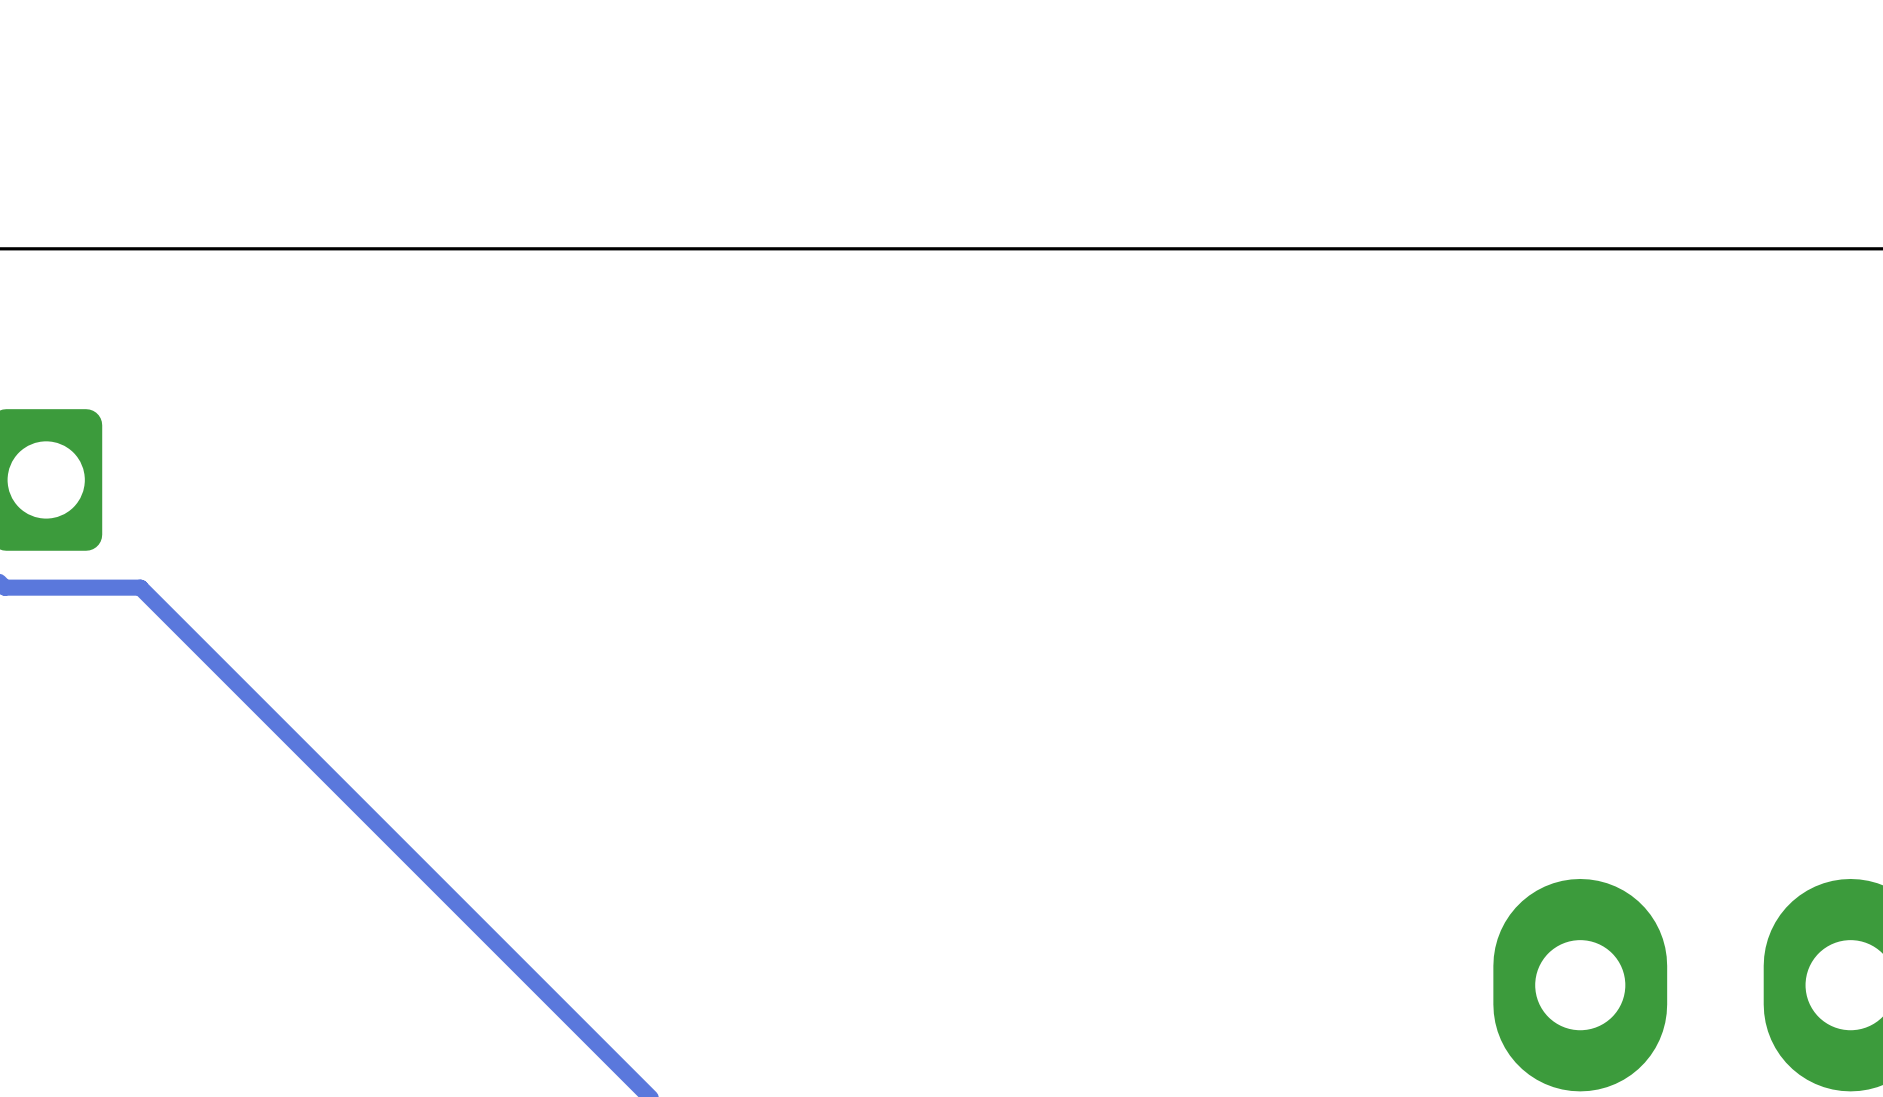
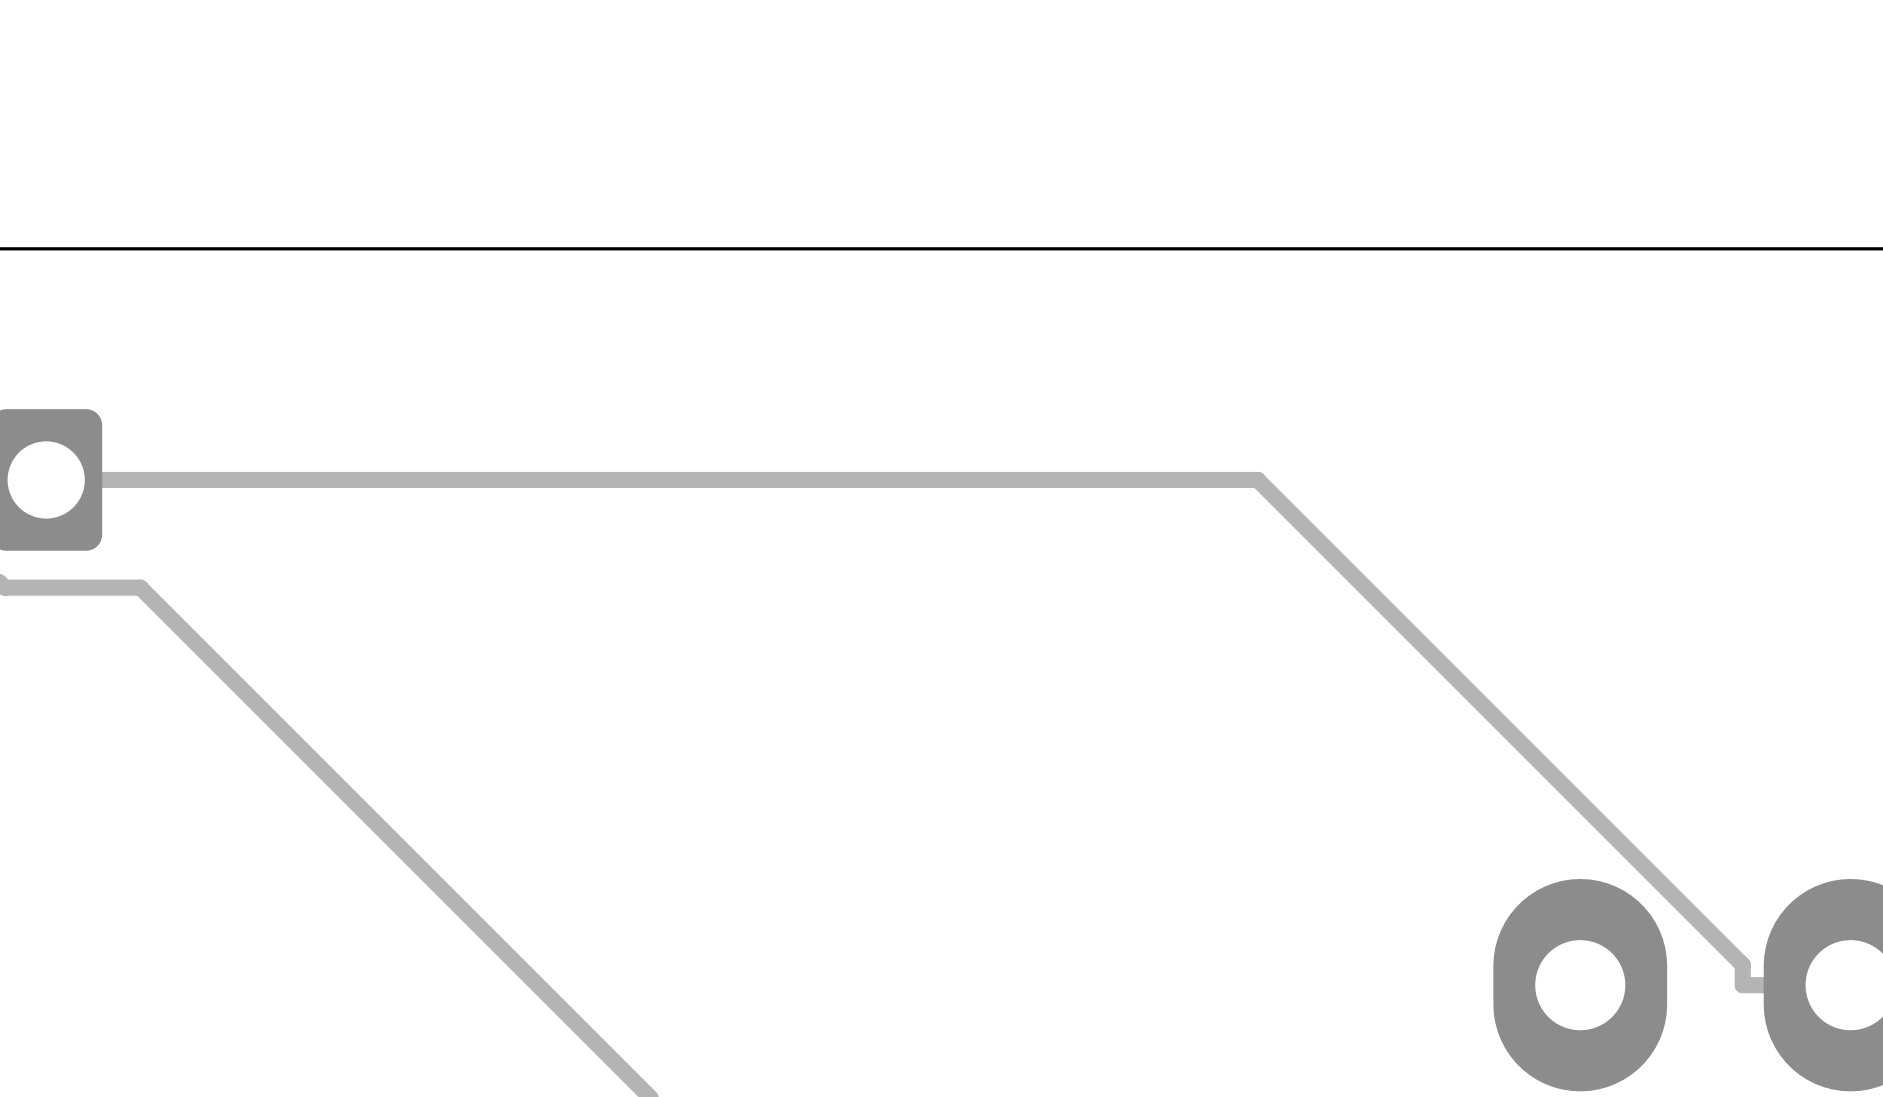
track: none -> (46, 479) (1257, 479) (1742, 964) (1742, 985) (1850, 985)

